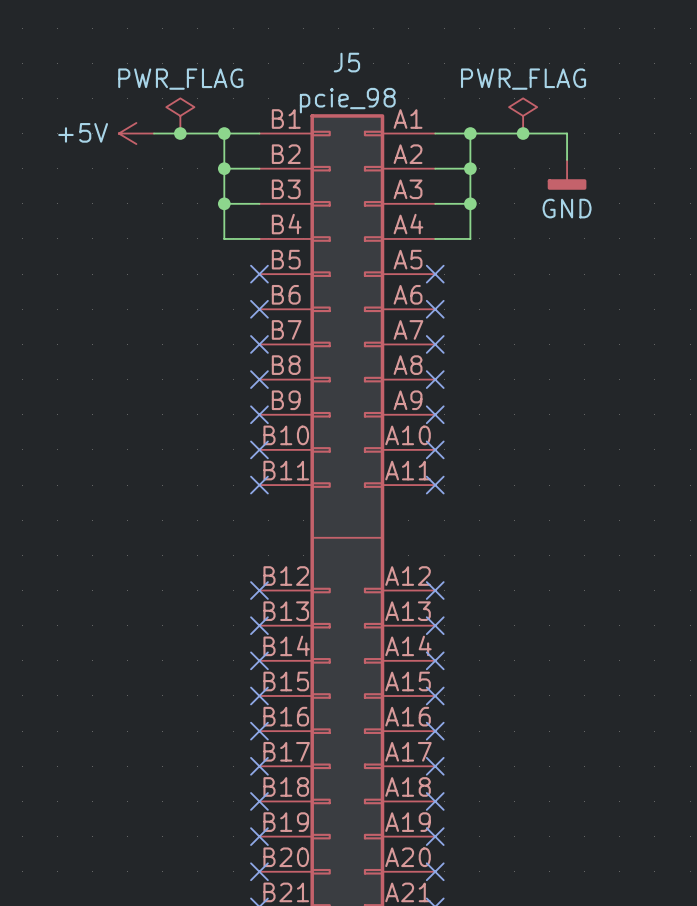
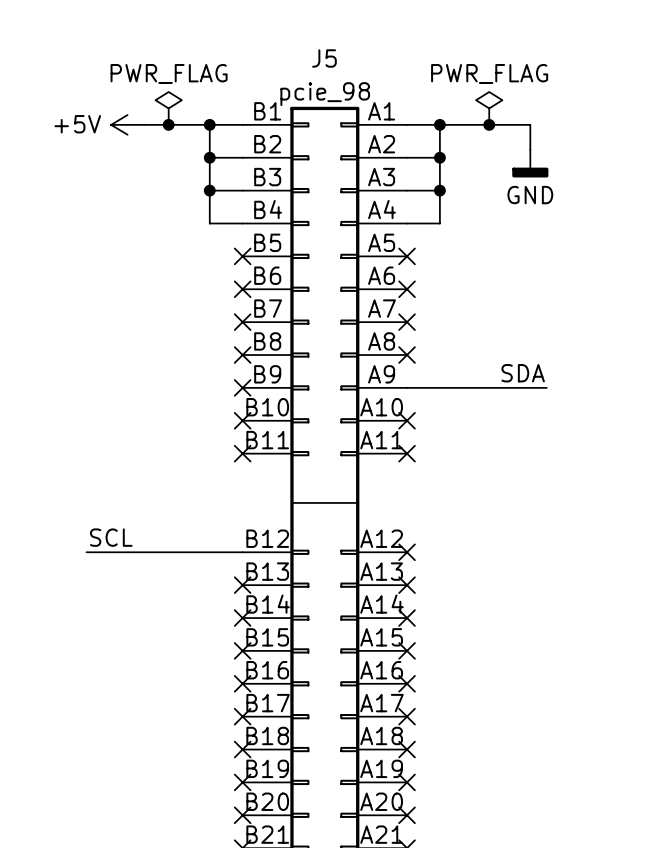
label: none -> SDA (523, 373)
wire: none -> (407, 387) (546, 387)
no-connect mark: (435, 414) -> none
label: none -> SCL (111, 537)
wire: none -> (86, 552) (242, 552)
no-connect mark: (259, 590) -> none

